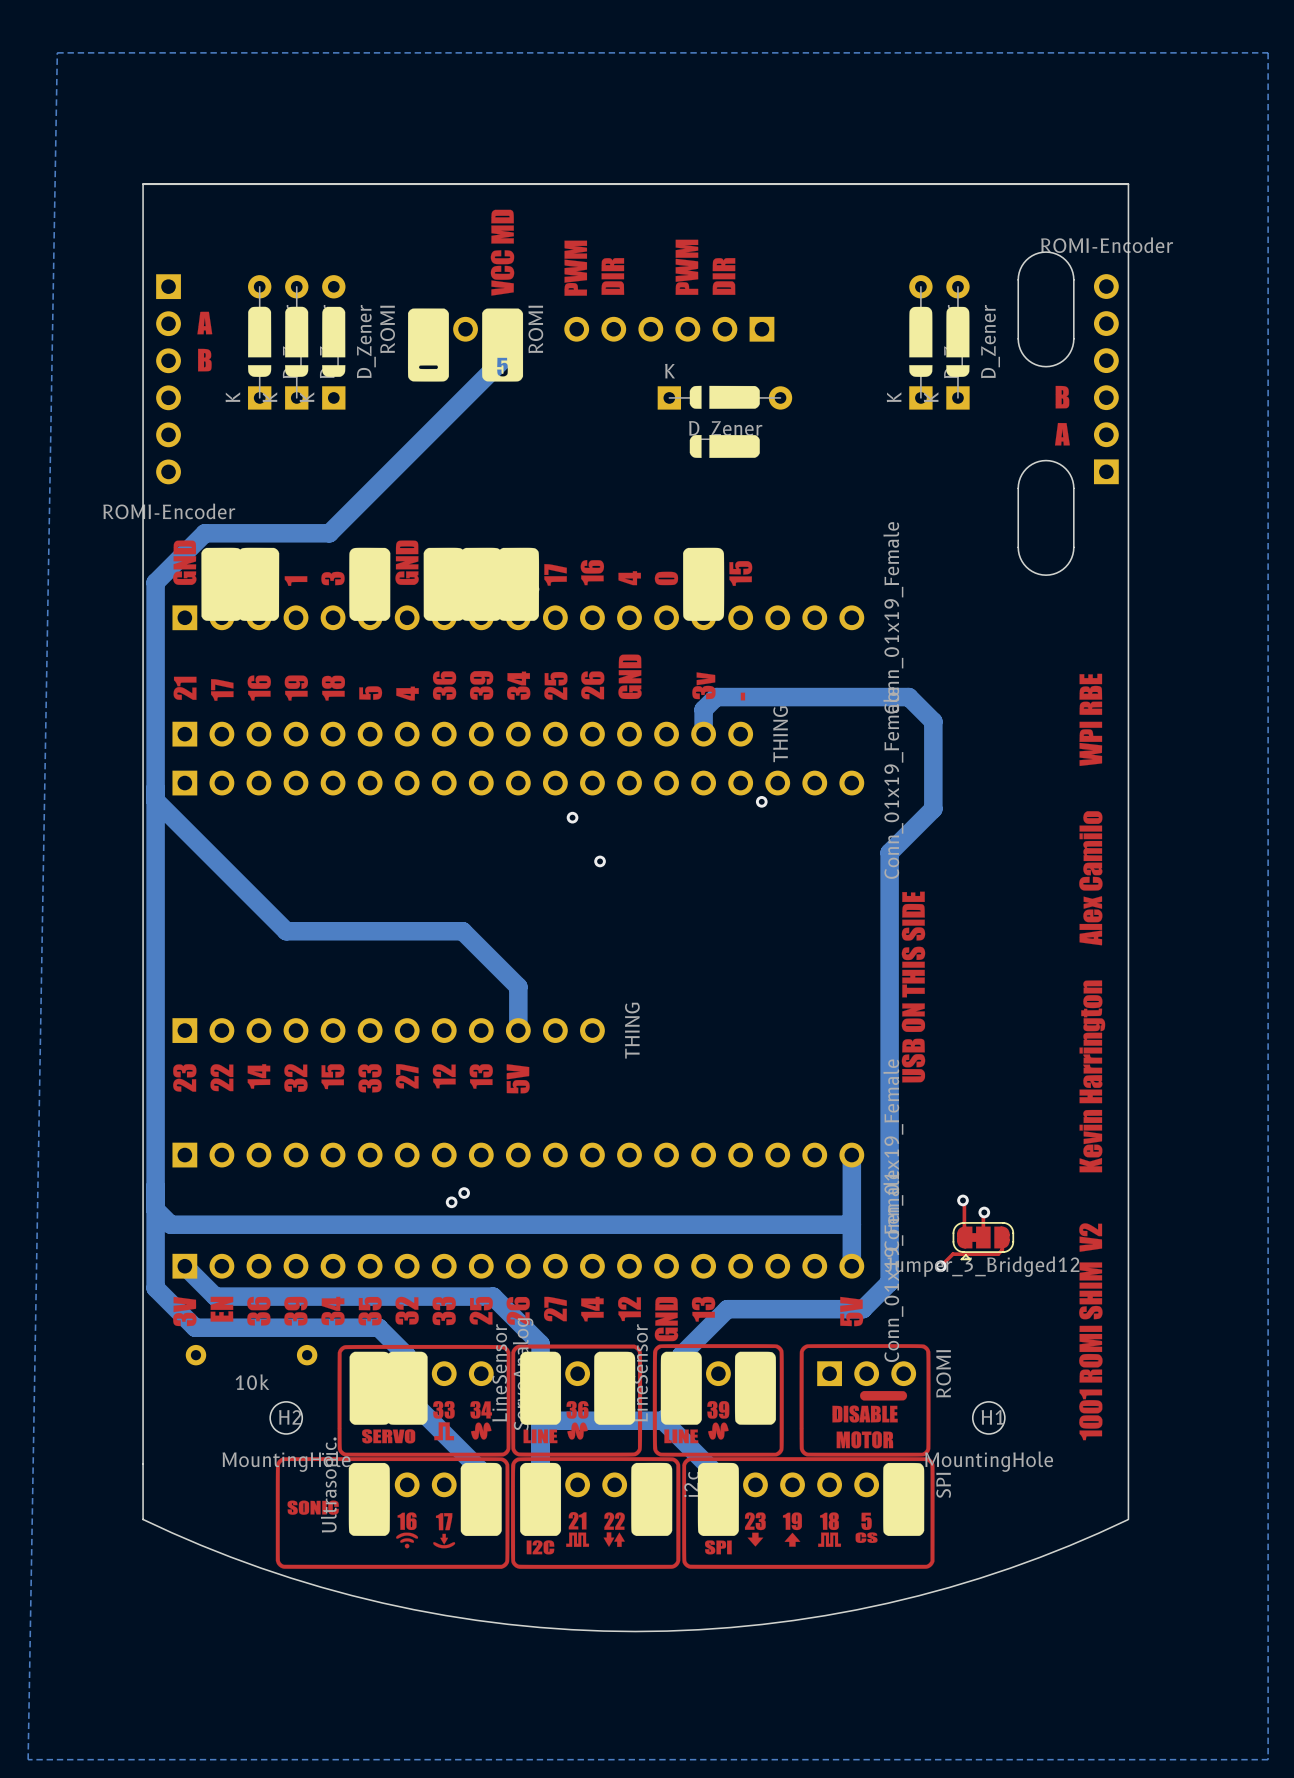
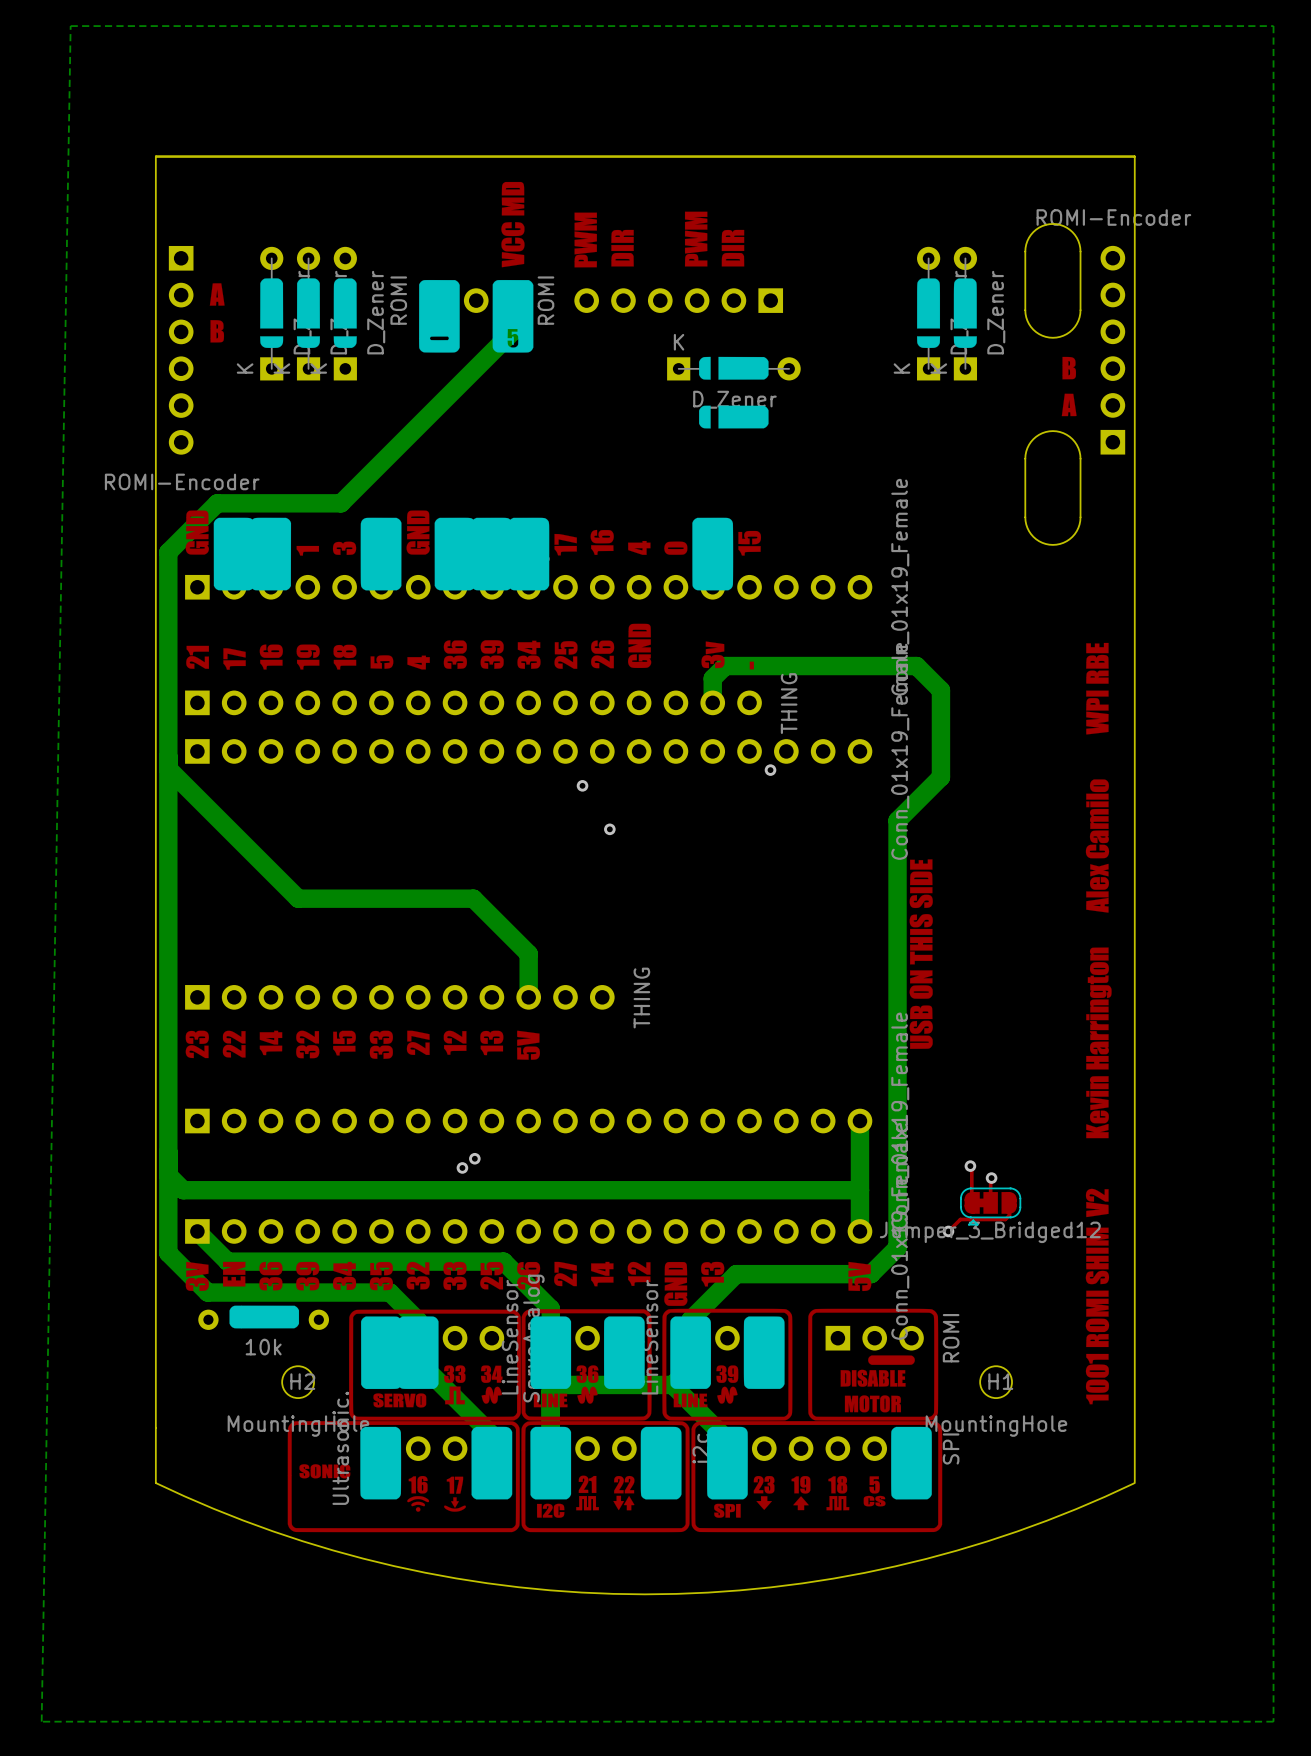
drawing shape: [173, 209, 1106, 1569] -> [185, 181, 1112, 1533]

